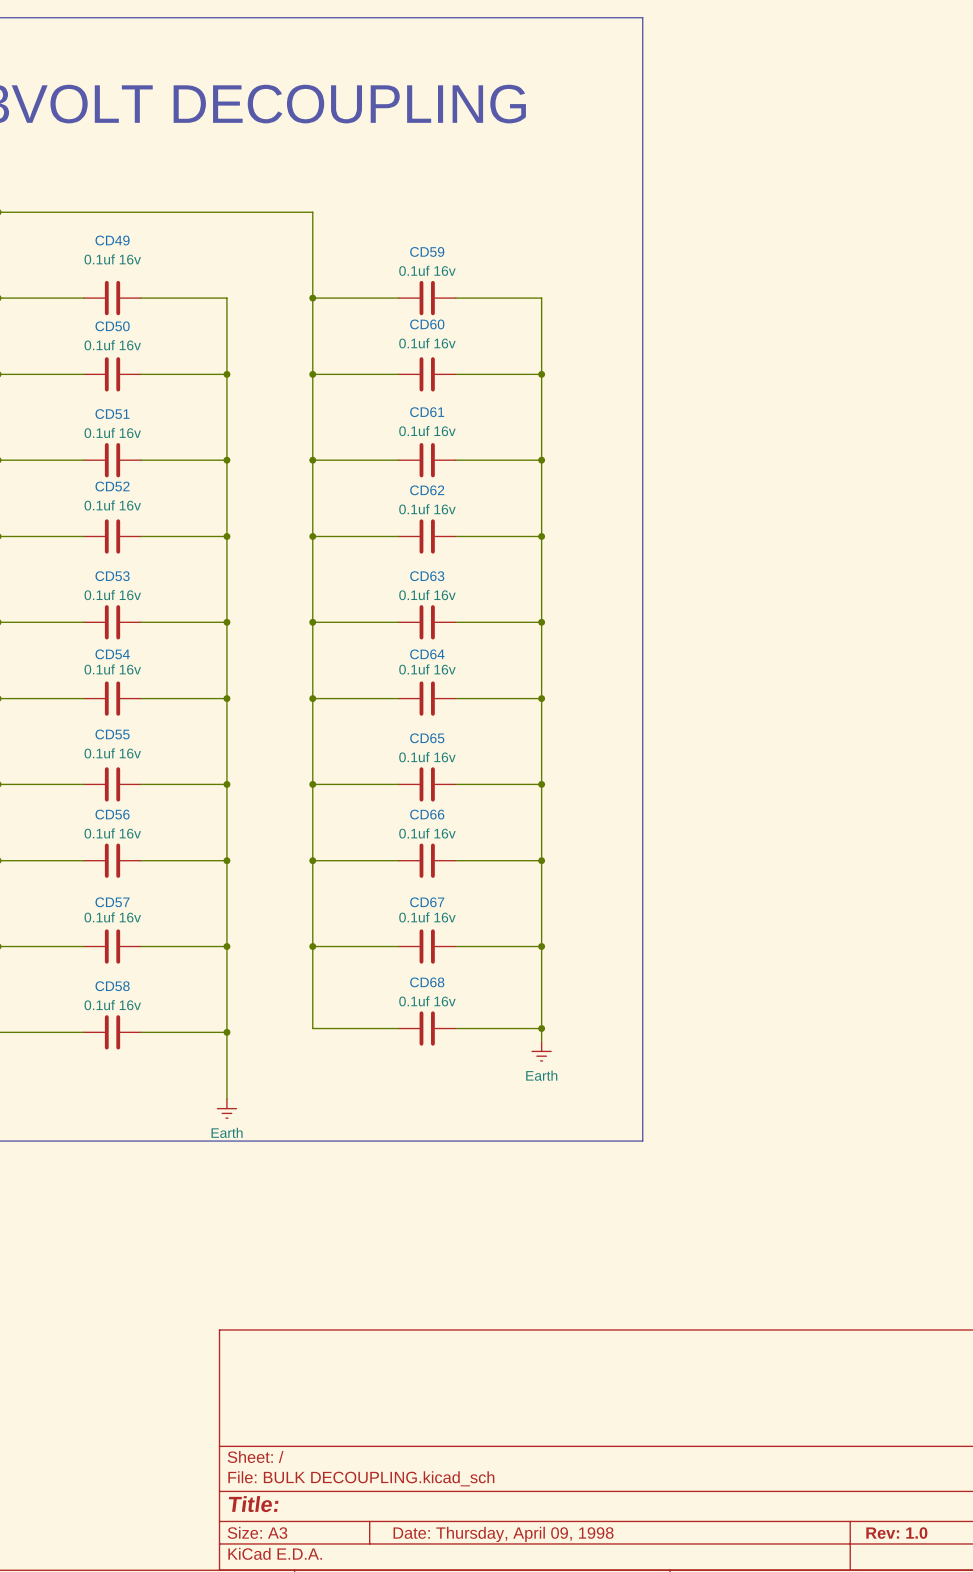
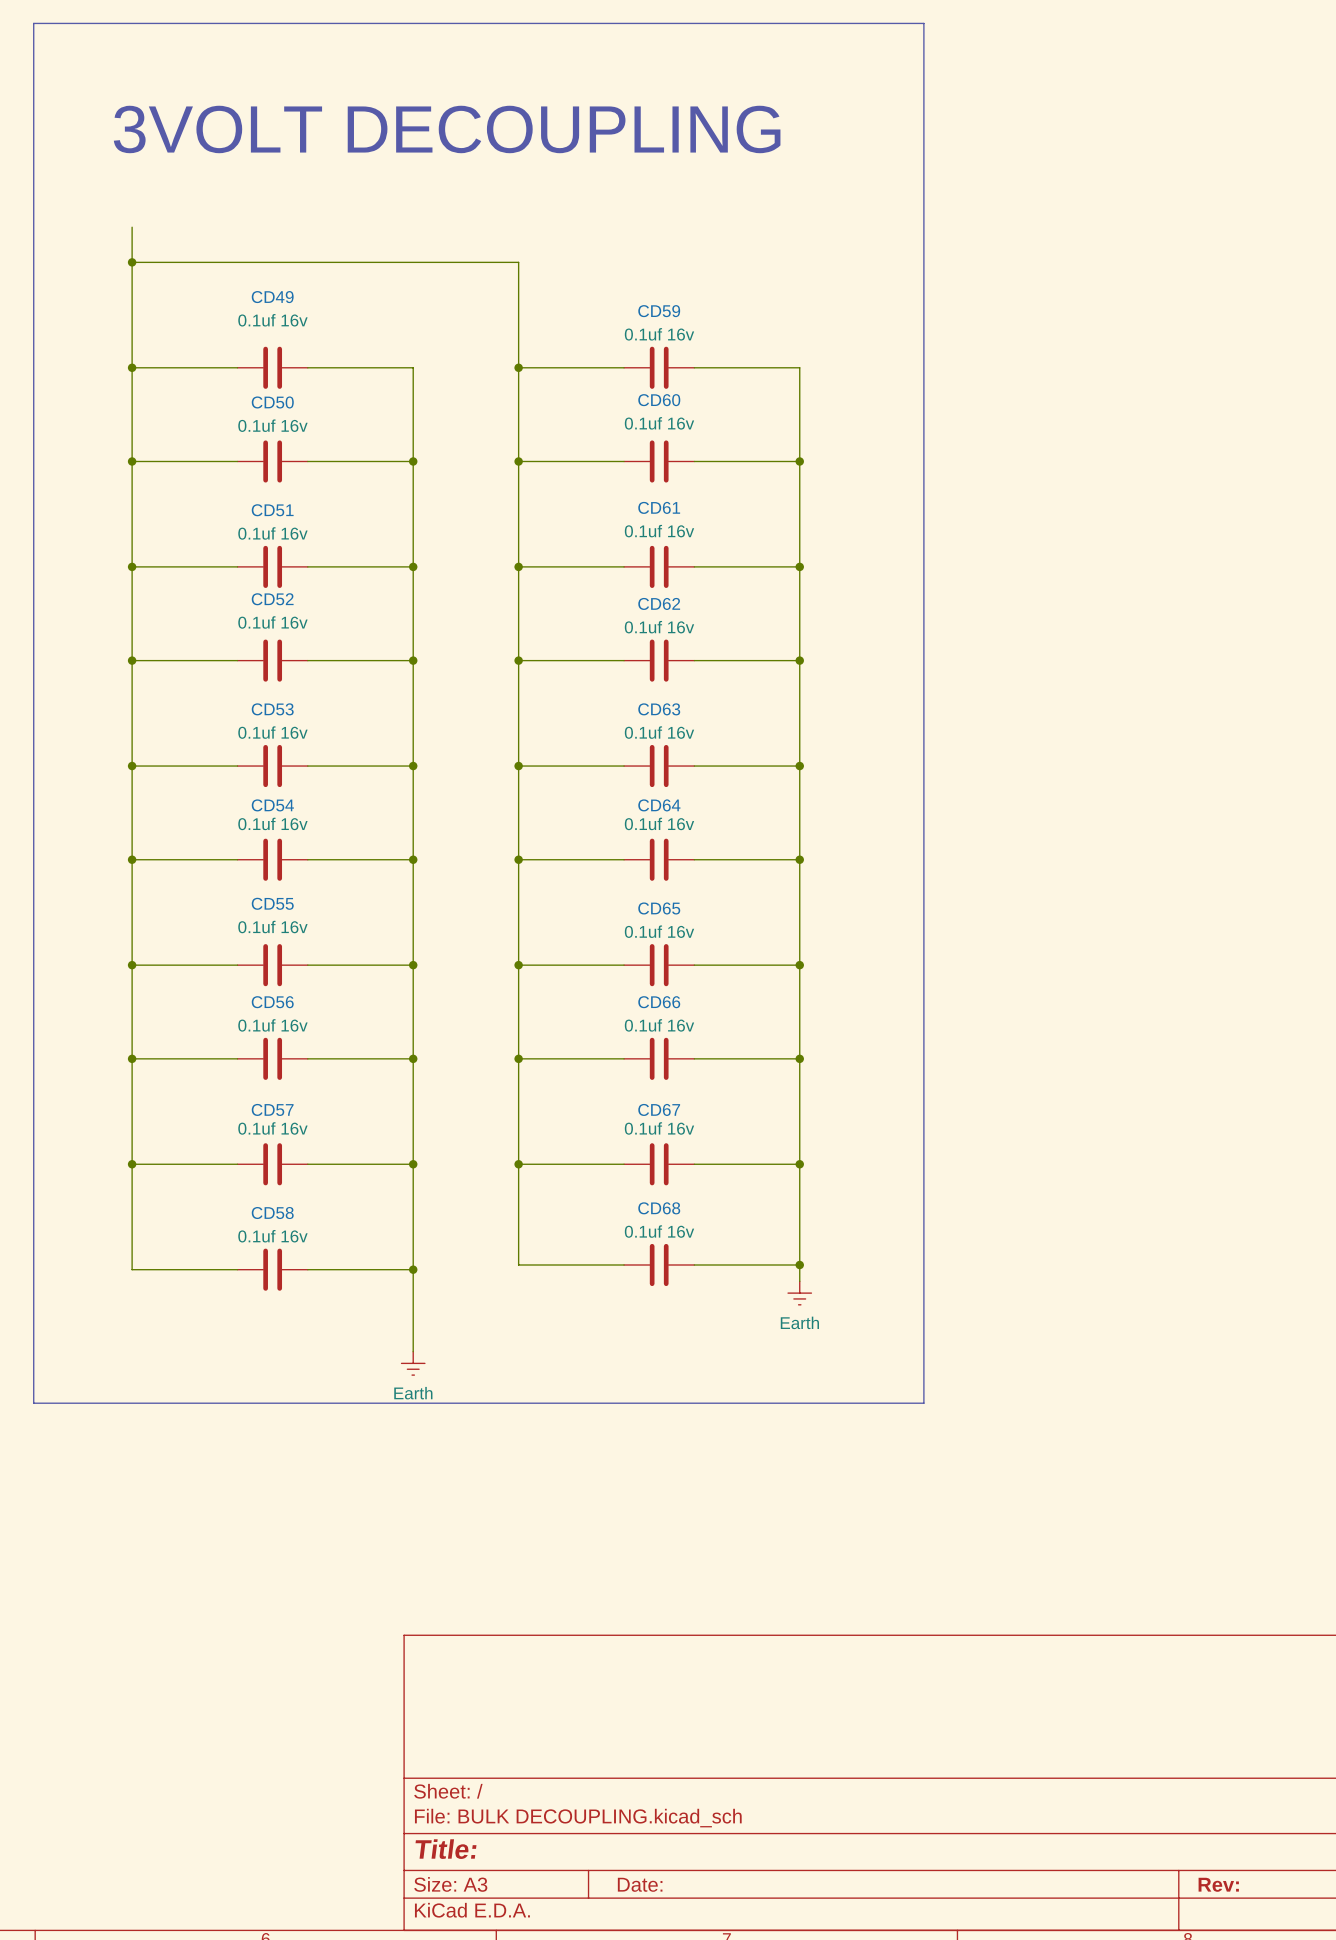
title block: Rev: 1.0 (896, 1533) -> Rev: (1218, 1884)
title block: Date: Thursday, April 09, 1998 (503, 1534) -> Date: (640, 1884)

